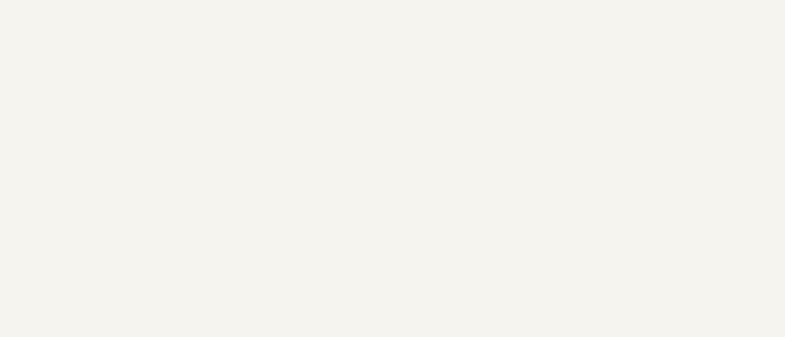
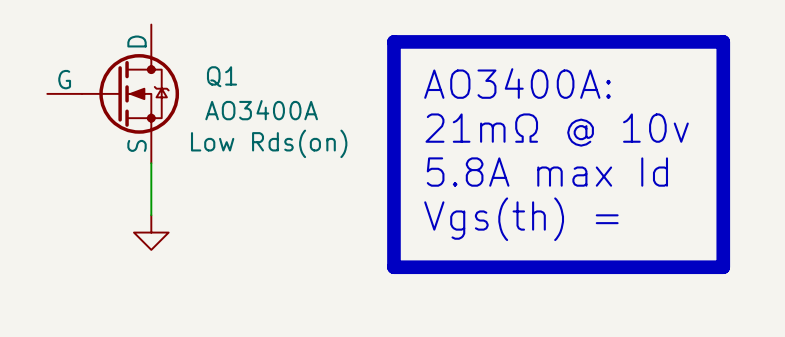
line: none -> (393, 41) (723, 41) (723, 267) (393, 267) (393, 41)
text: none -> AO3400A: (517, 83)
Q1: none -> AO3400A (113, 93)
text: none -> 21mΩ @ 10v (557, 130)
wire: none -> (151, 163) (151, 215)
text: none -> 5.8A max Id (547, 172)
text: none -> Vgs(th) = (521, 219)
power symbol: none -> (151, 232)

